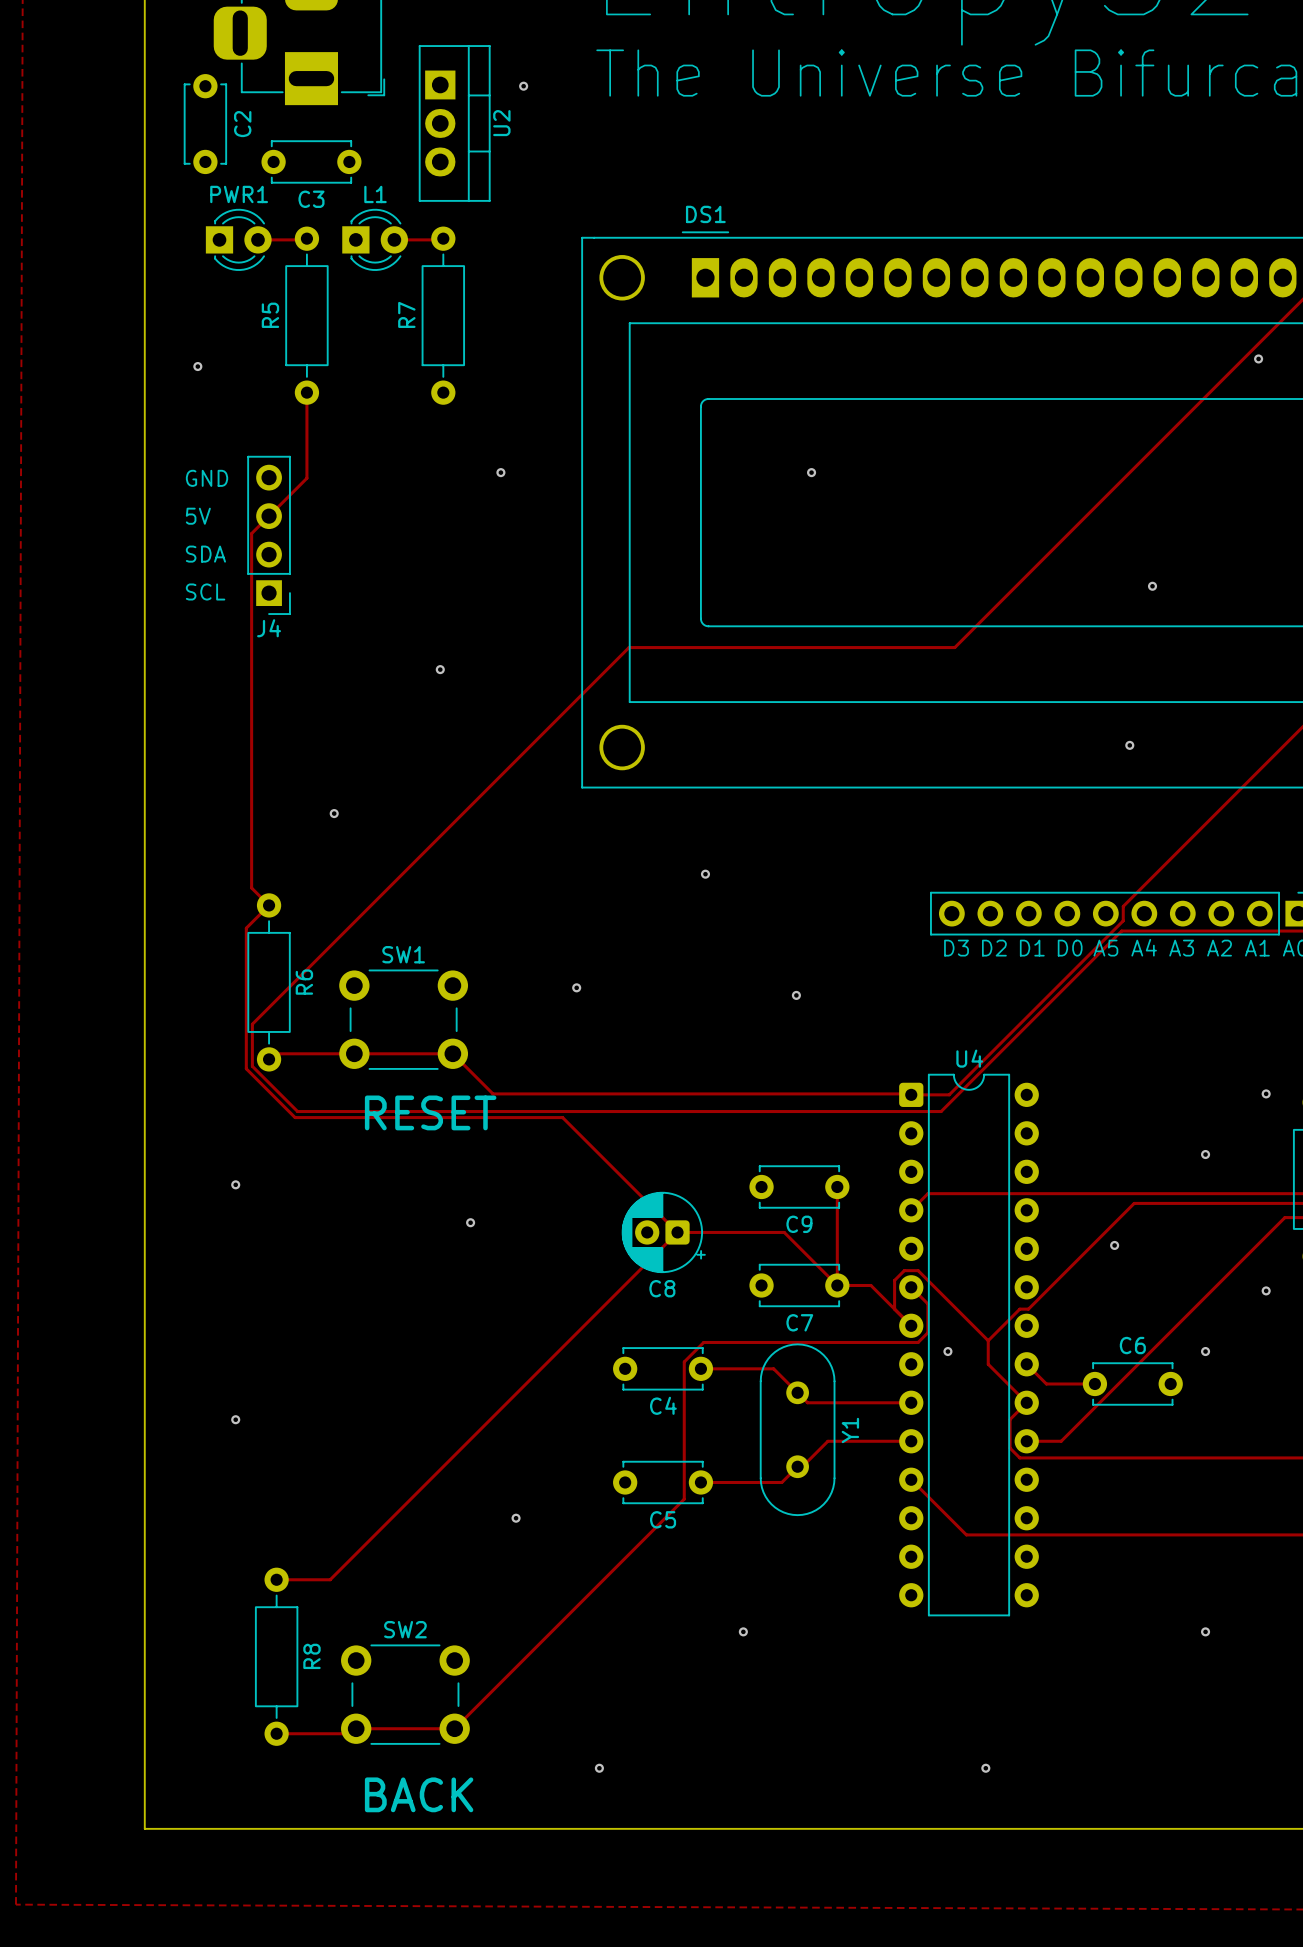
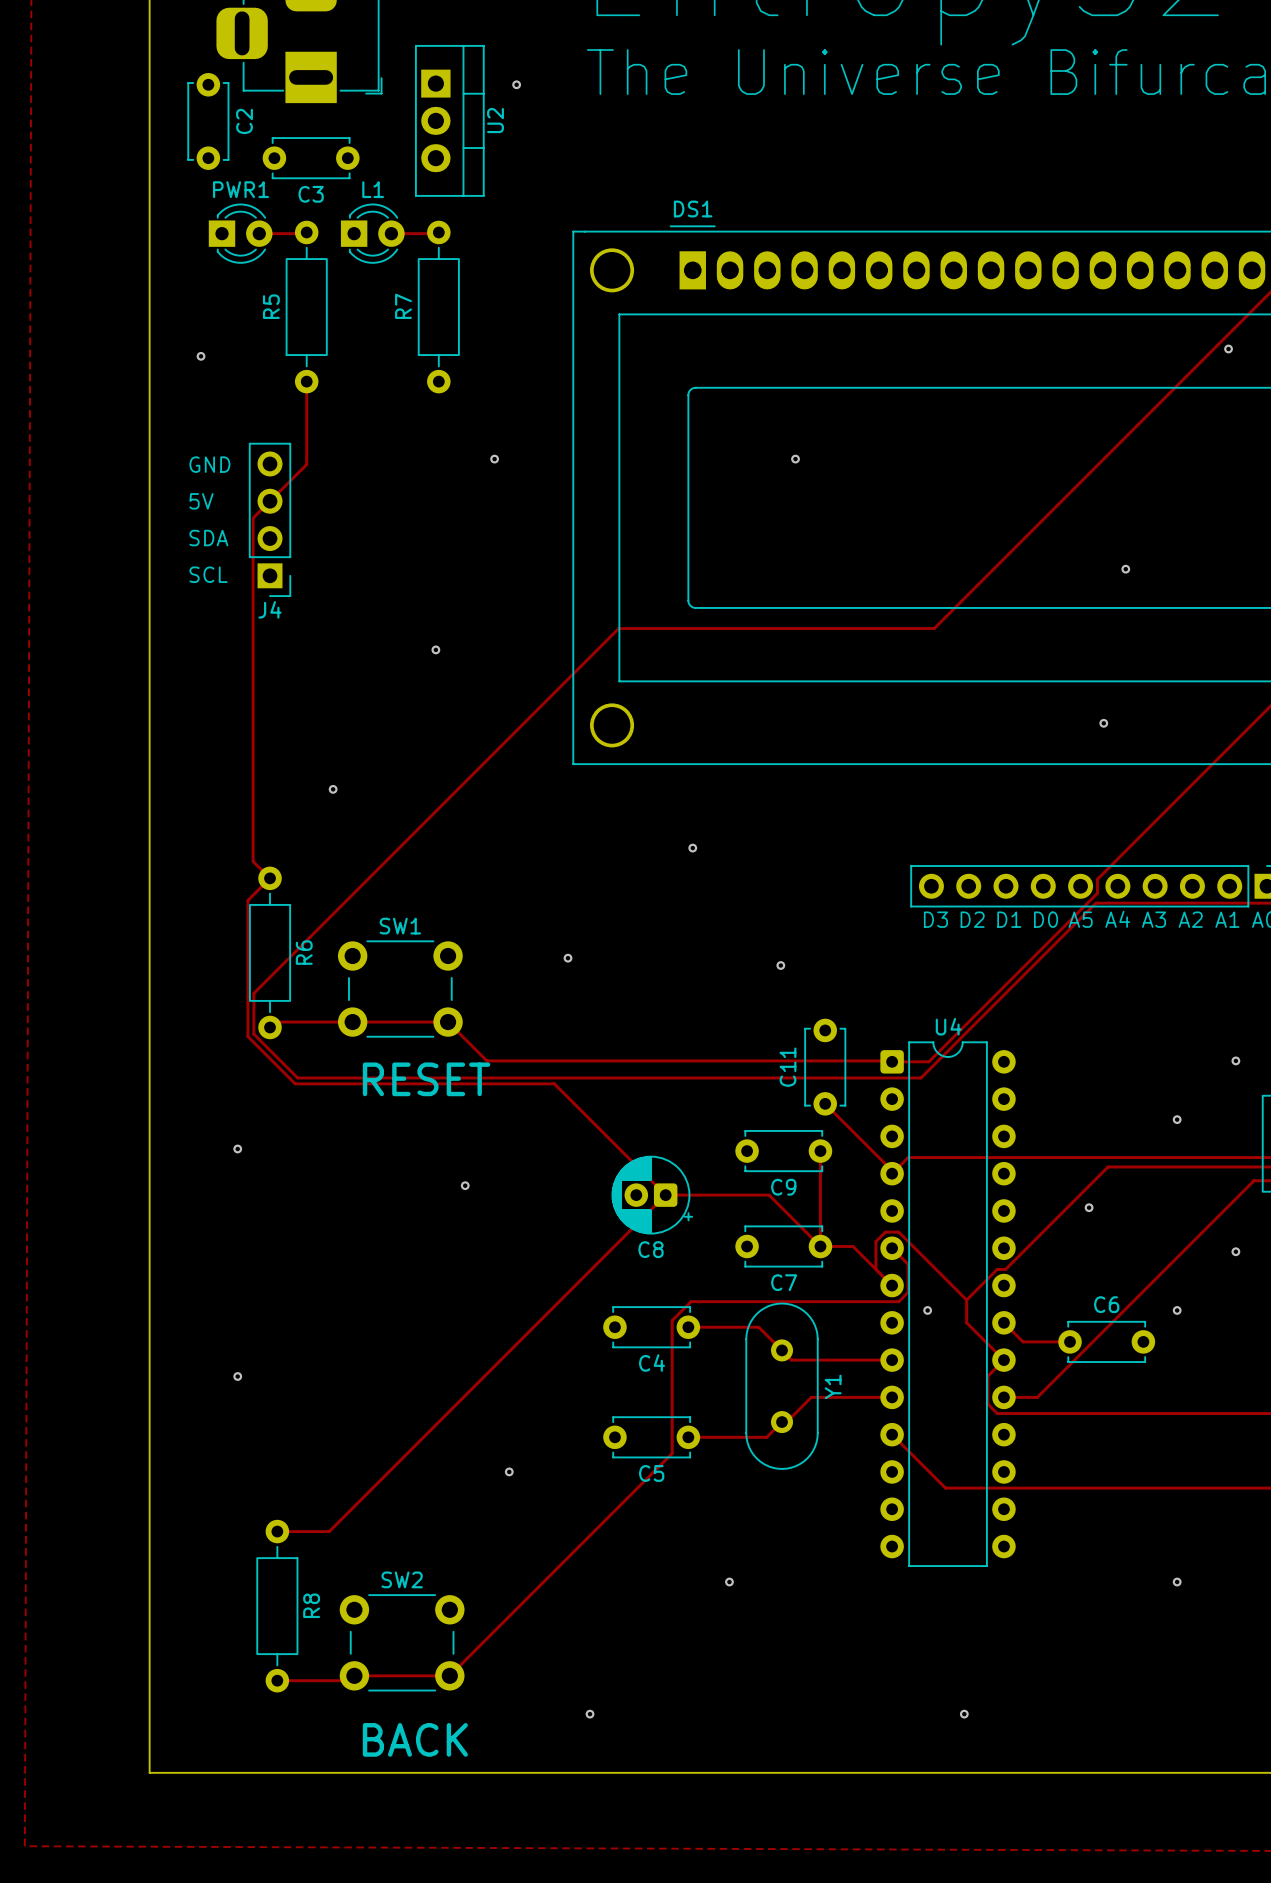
C11: none -> (825, 1067)
track: none -> (825, 1103) (892, 1170) (892, 1173)

